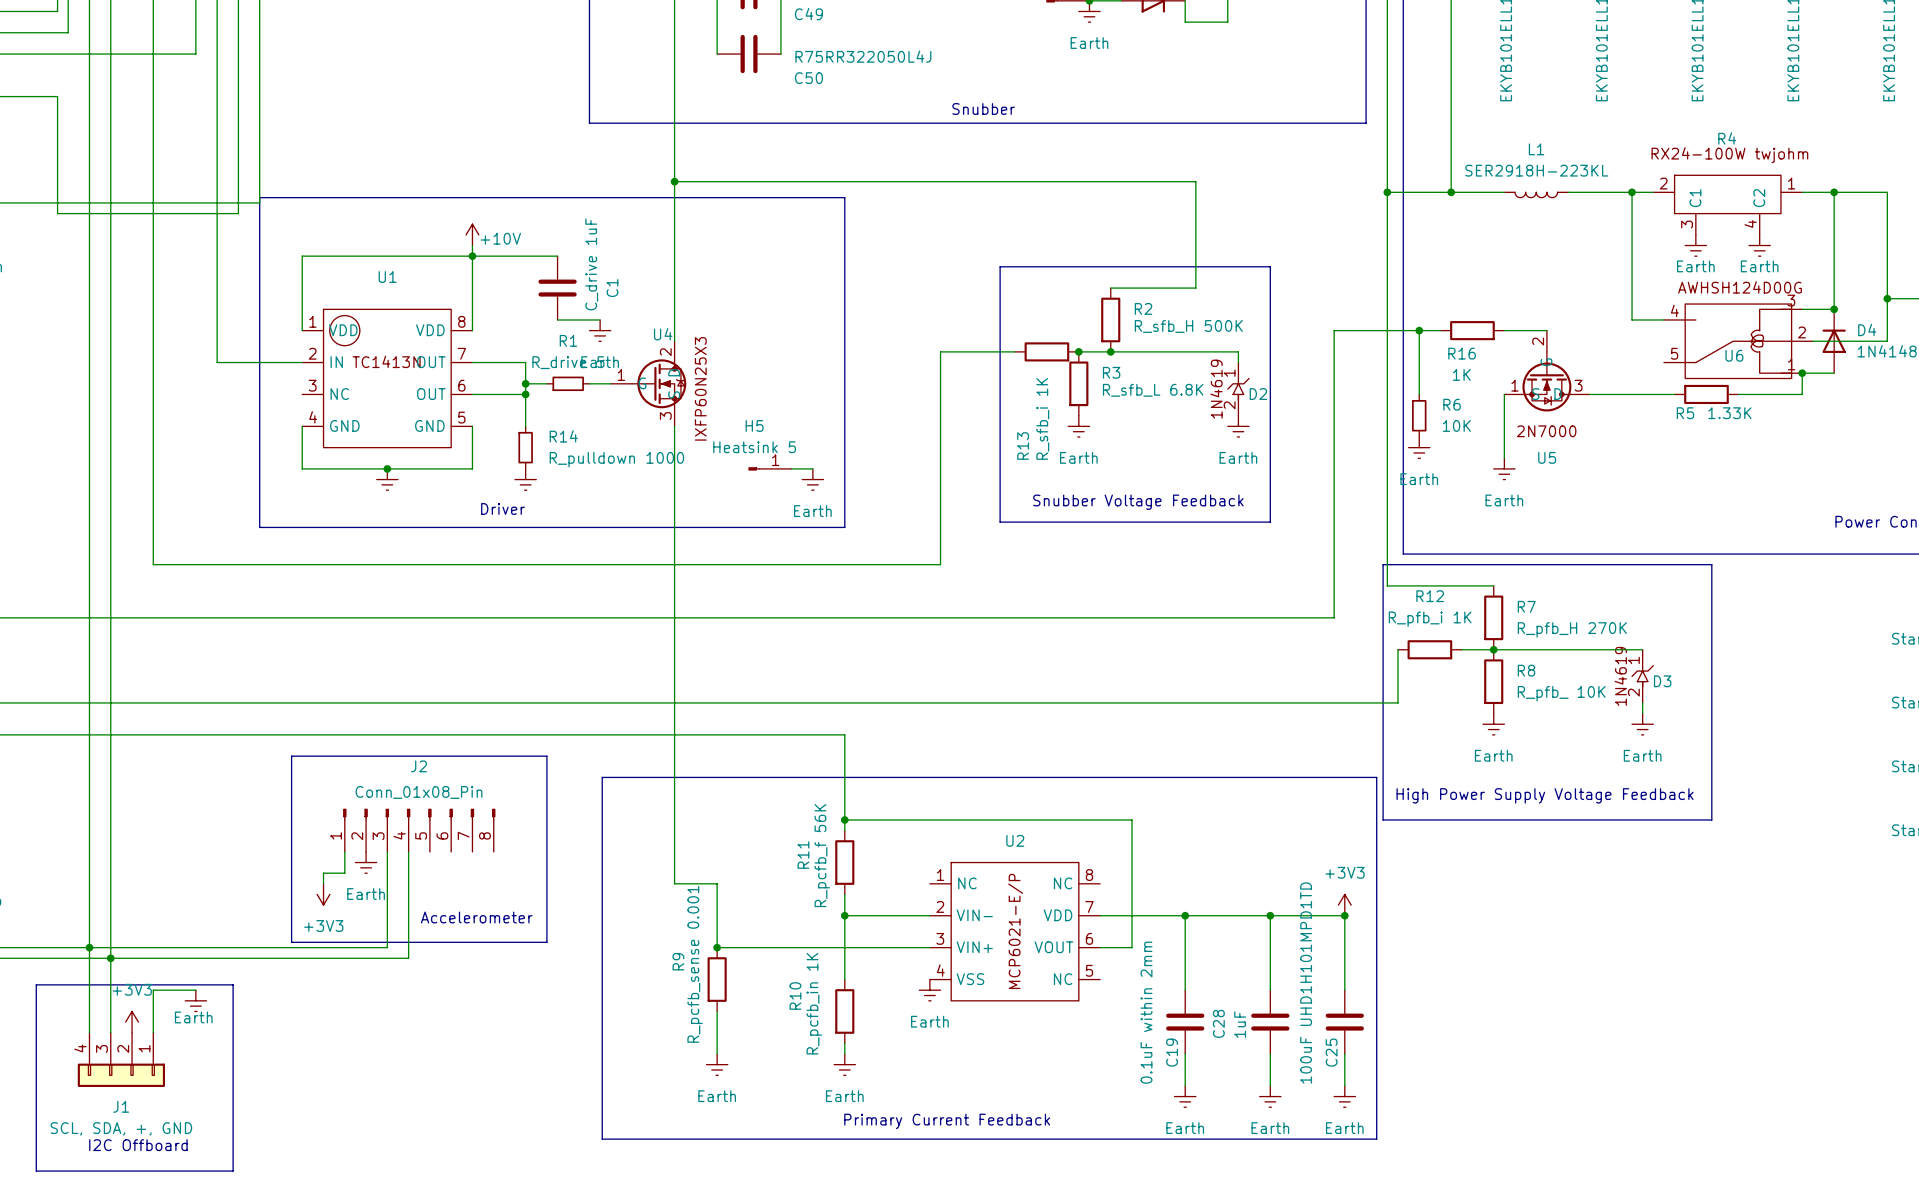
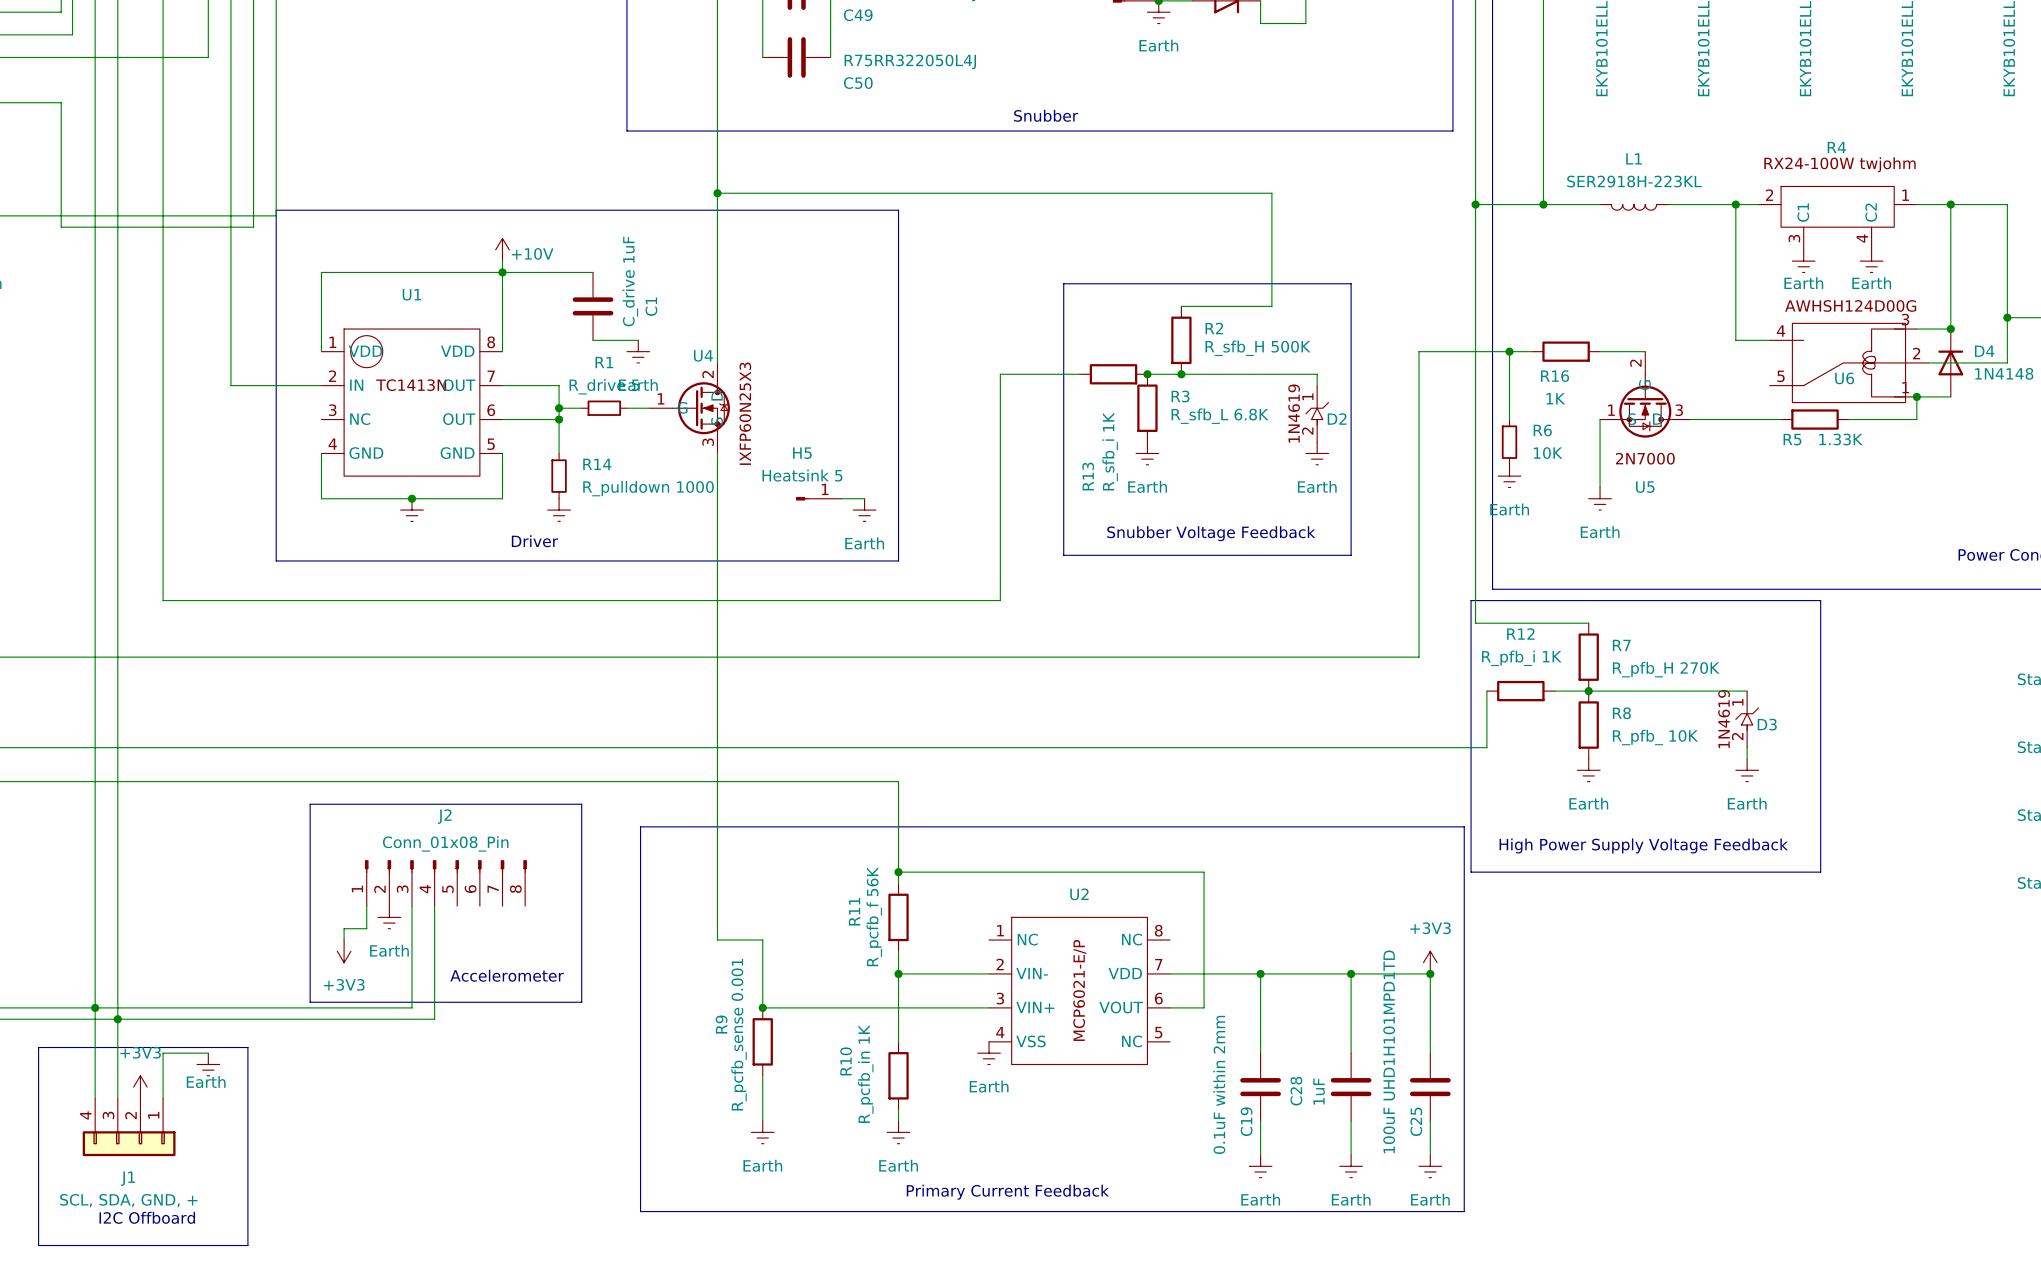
J1 value: SCL, SDA, +, GND (121, 1128) -> SCL, SDA, GND, + (128, 1200)

